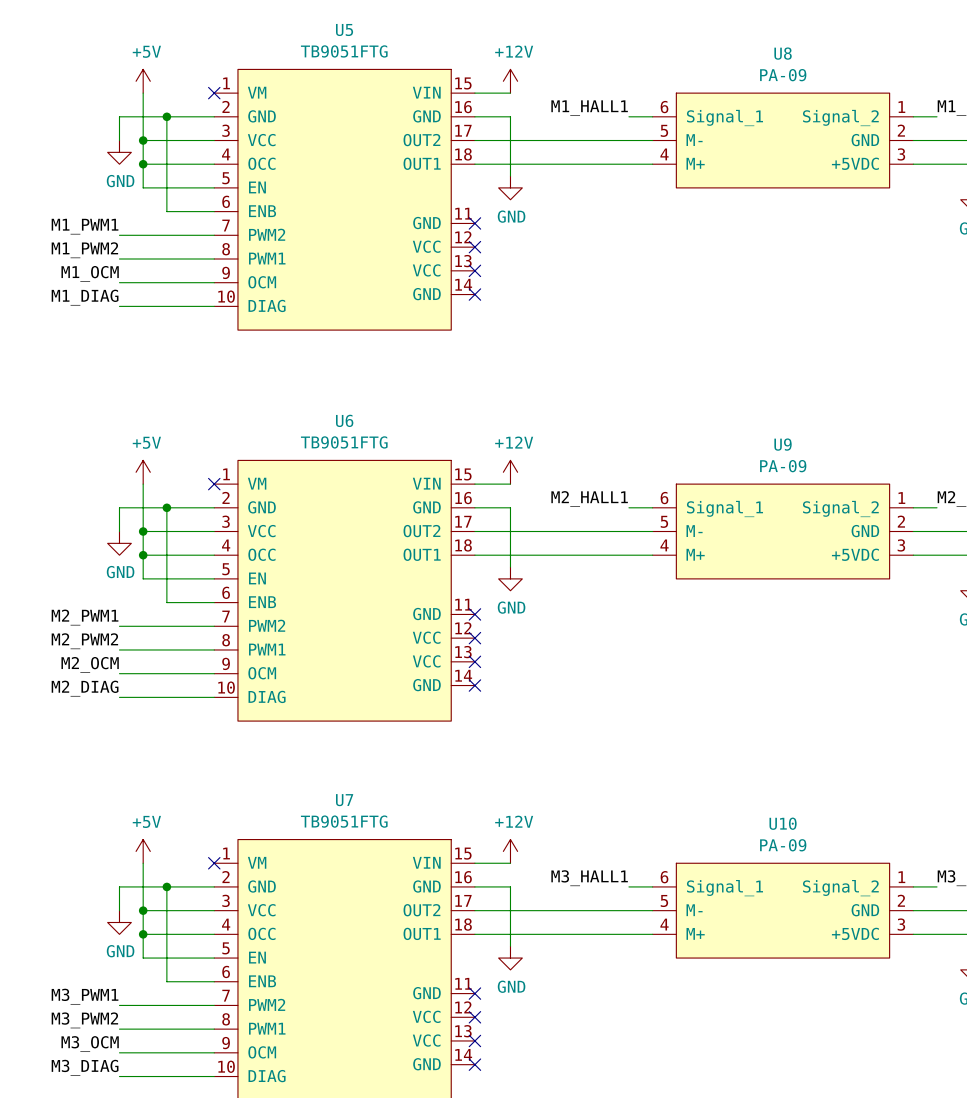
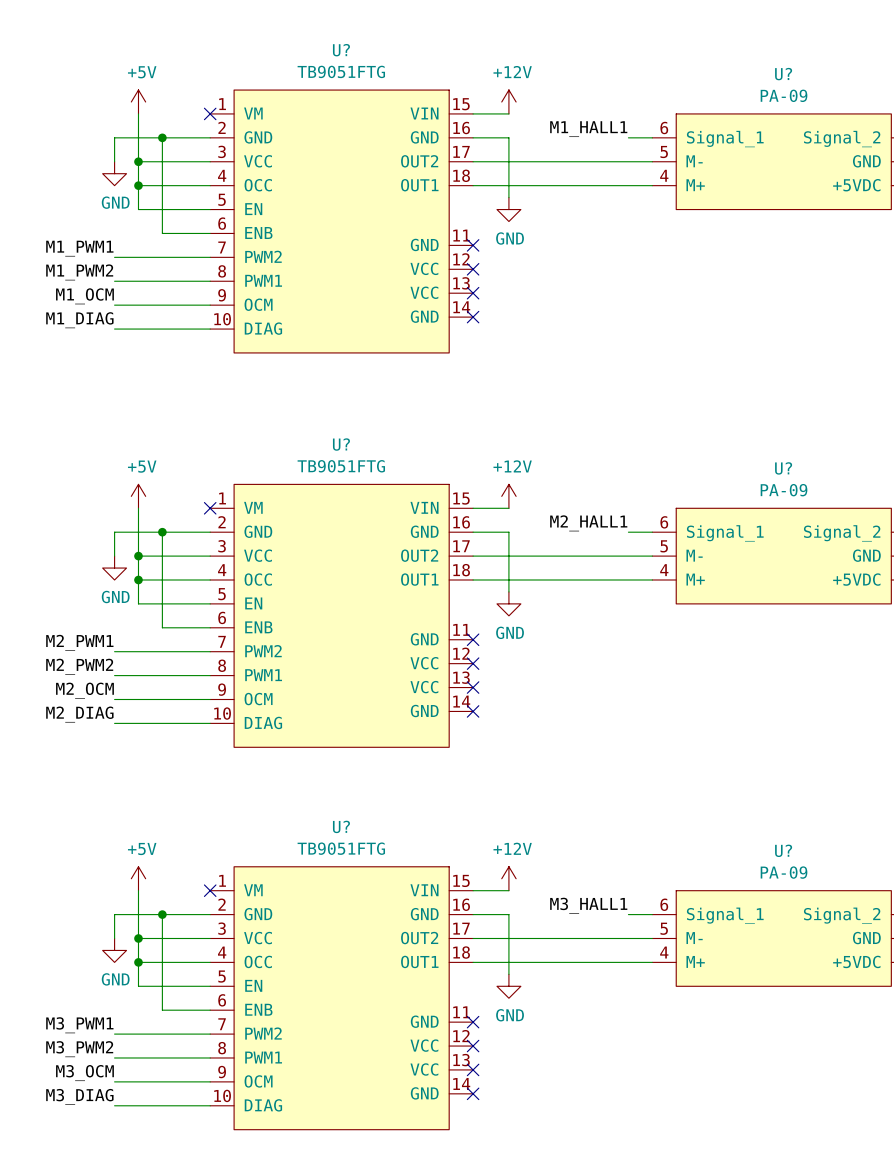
U5 name: U5 (344, 30) -> U? (341, 50)
U8 name: U8 (783, 53) -> U? (783, 74)
U6 name: U6 (344, 420) -> U? (341, 444)
U9 name: U9 (783, 444) -> U? (783, 468)
U7 name: U7 (344, 800) -> U? (341, 826)
U10 name: U10 (783, 823) -> U? (783, 850)

